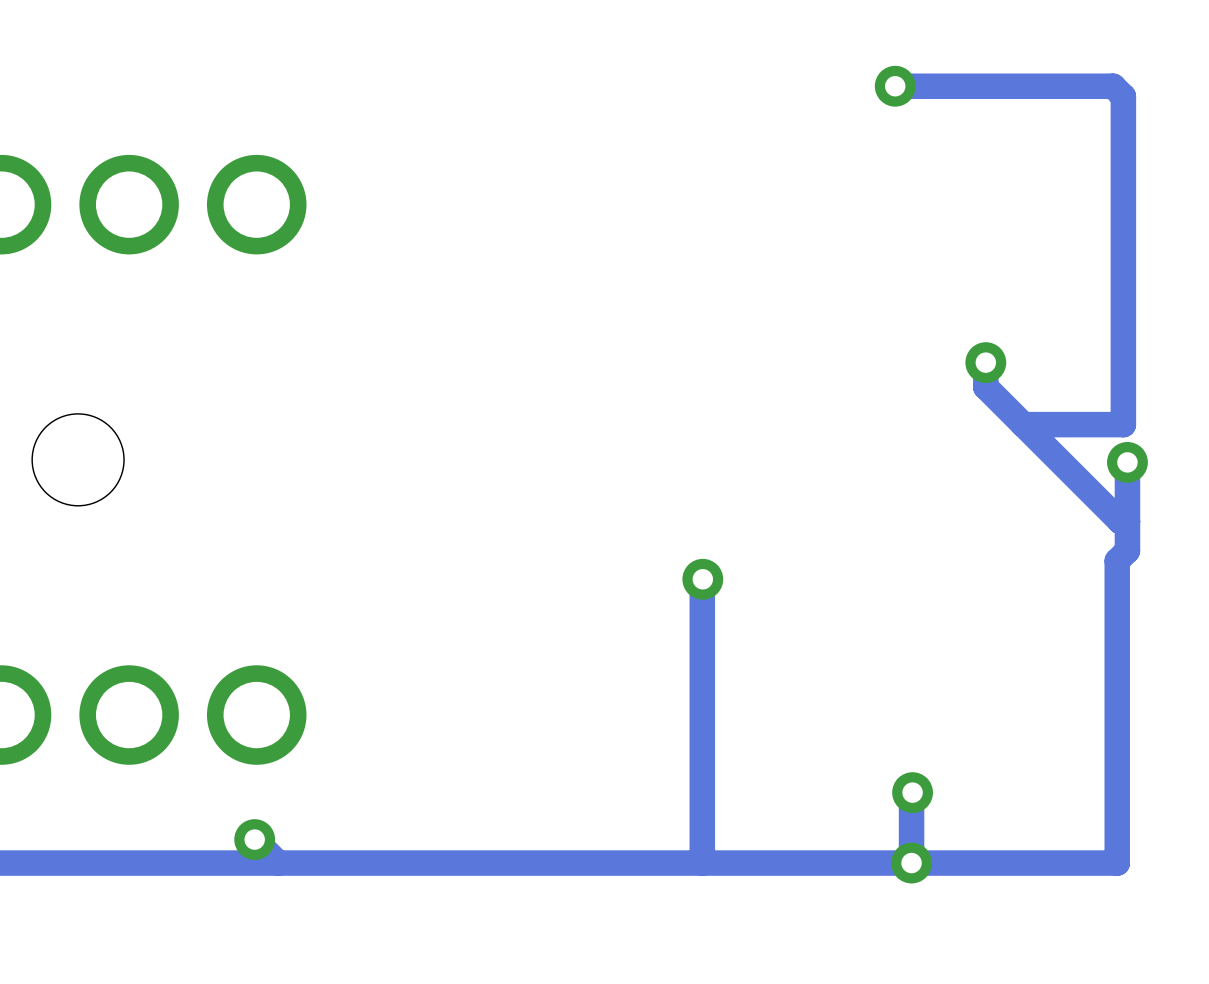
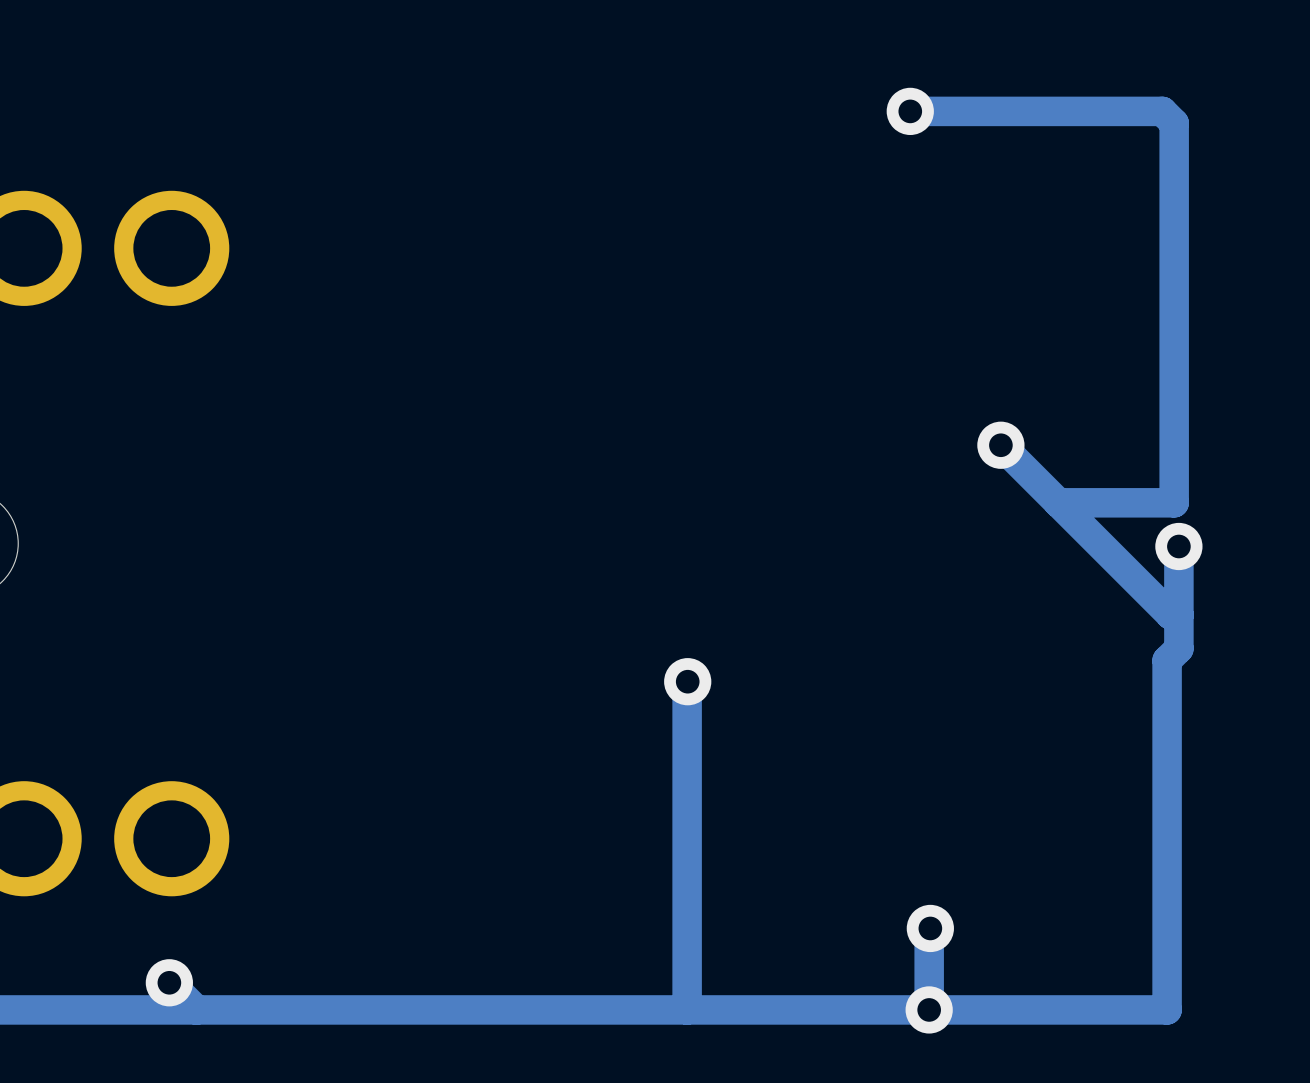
via position: (985, 362) -> (1000, 445)

